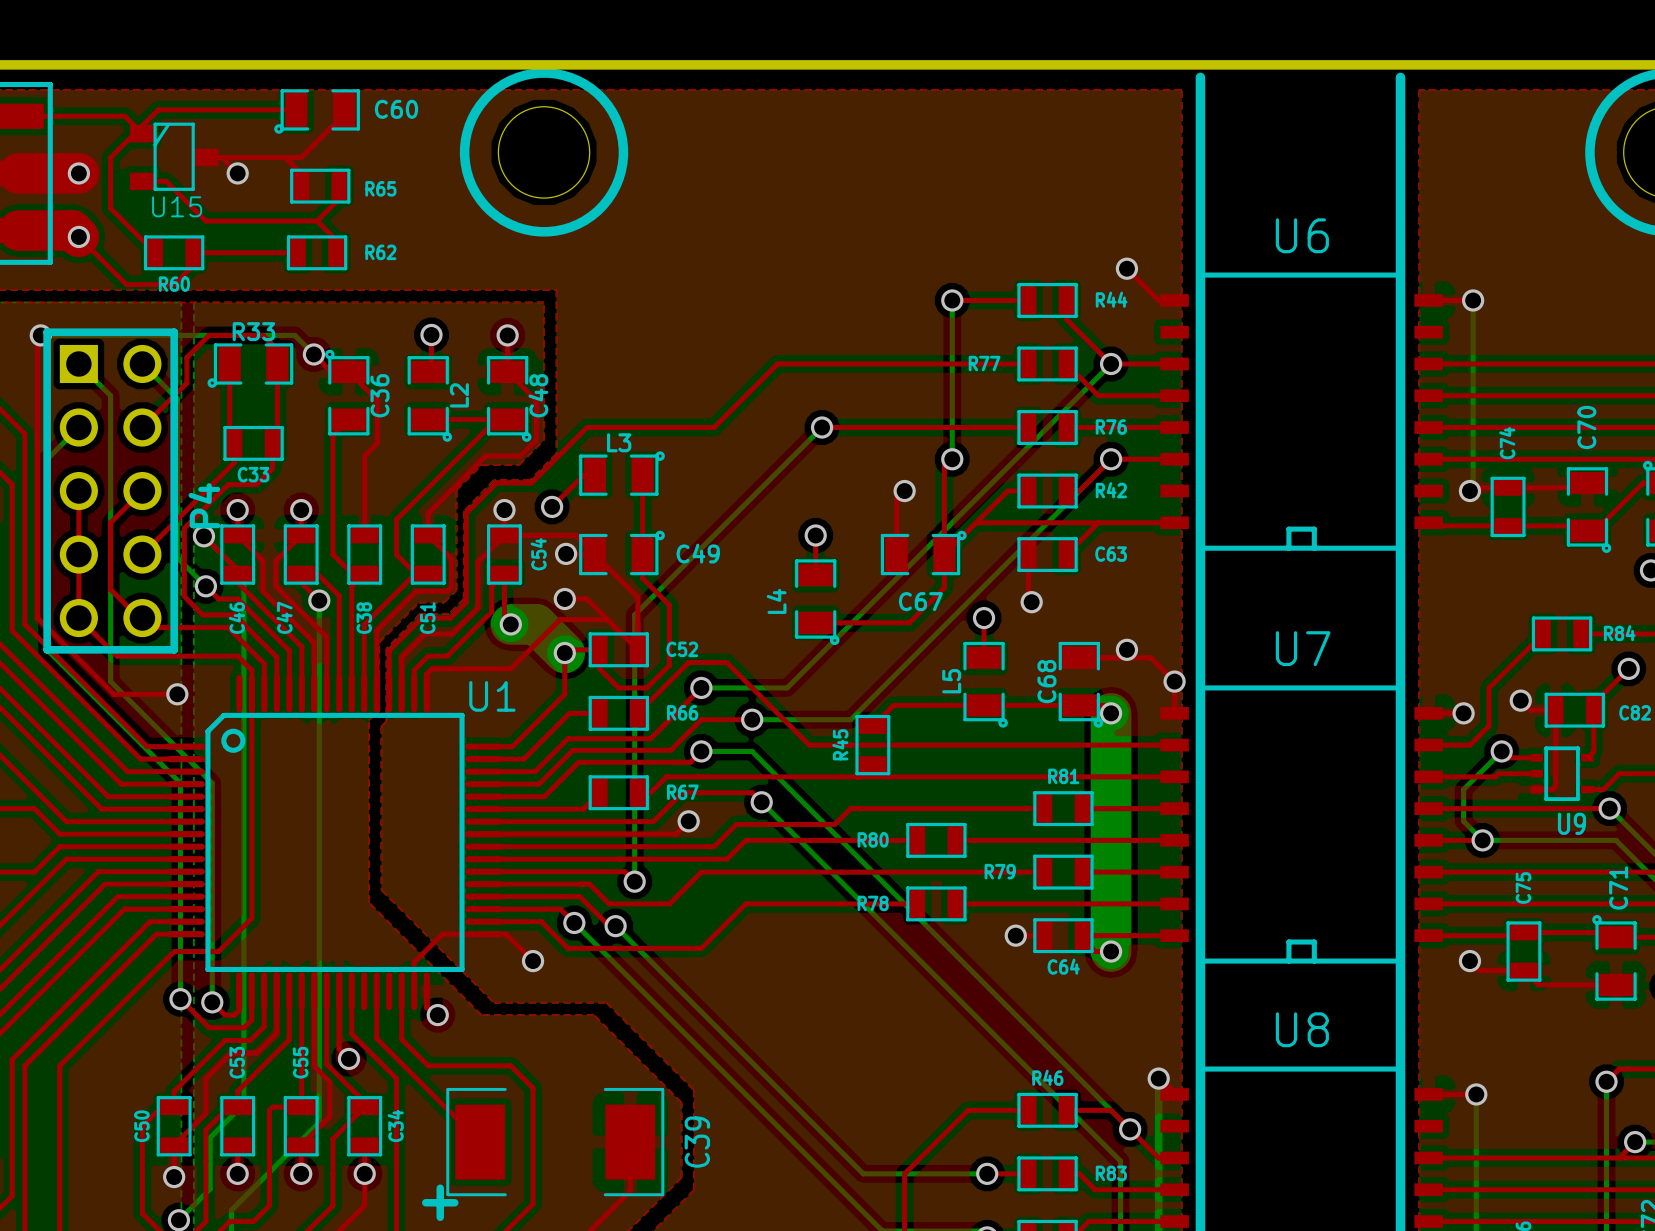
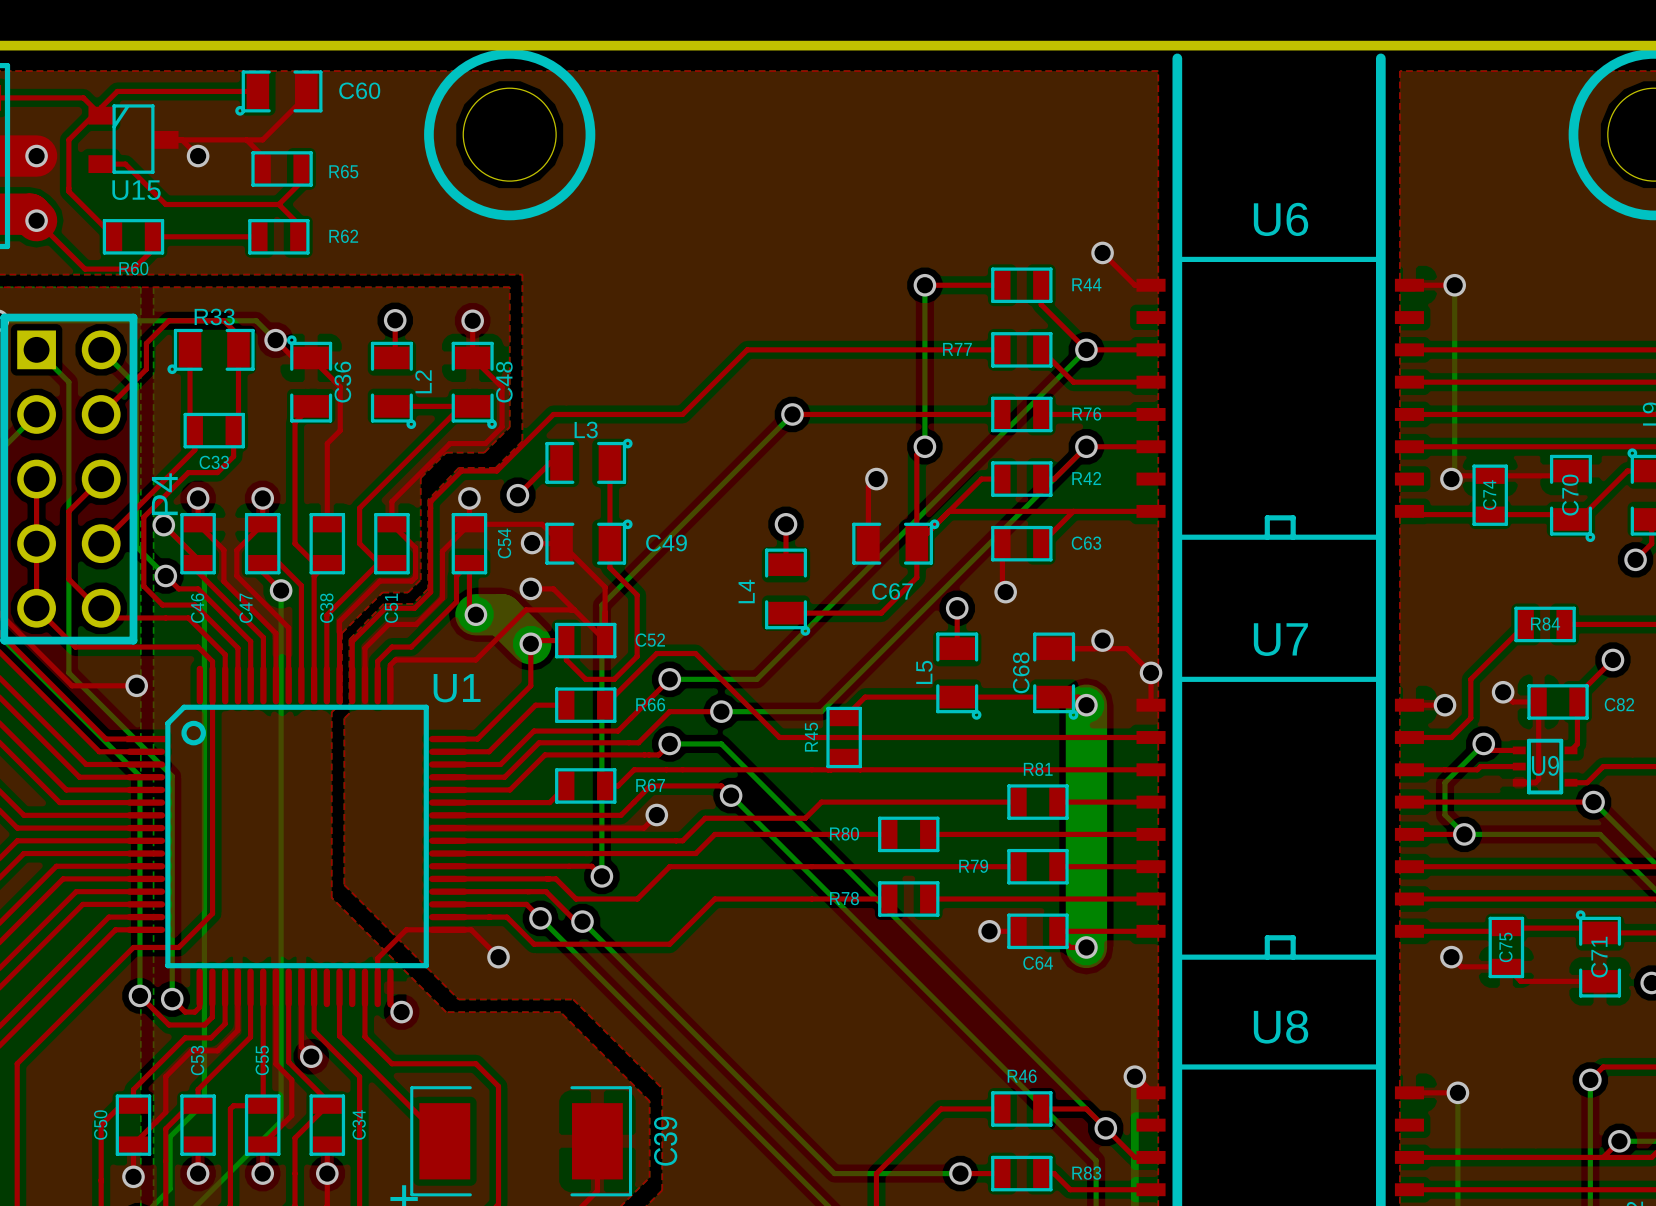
C70 name position: C70 (1586, 427) -> C70 (1570, 495)
C74 name position: C74 (1507, 443) -> C74 (1489, 495)
R84 name position: R84 (1619, 633) -> R84 (1545, 623)
U9 name position: U9 (1571, 823) -> U9 (1545, 765)
C75 name position: C75 (1523, 888) -> C75 (1505, 947)
C71 name position: C71 (1618, 888) -> C71 (1599, 957)

